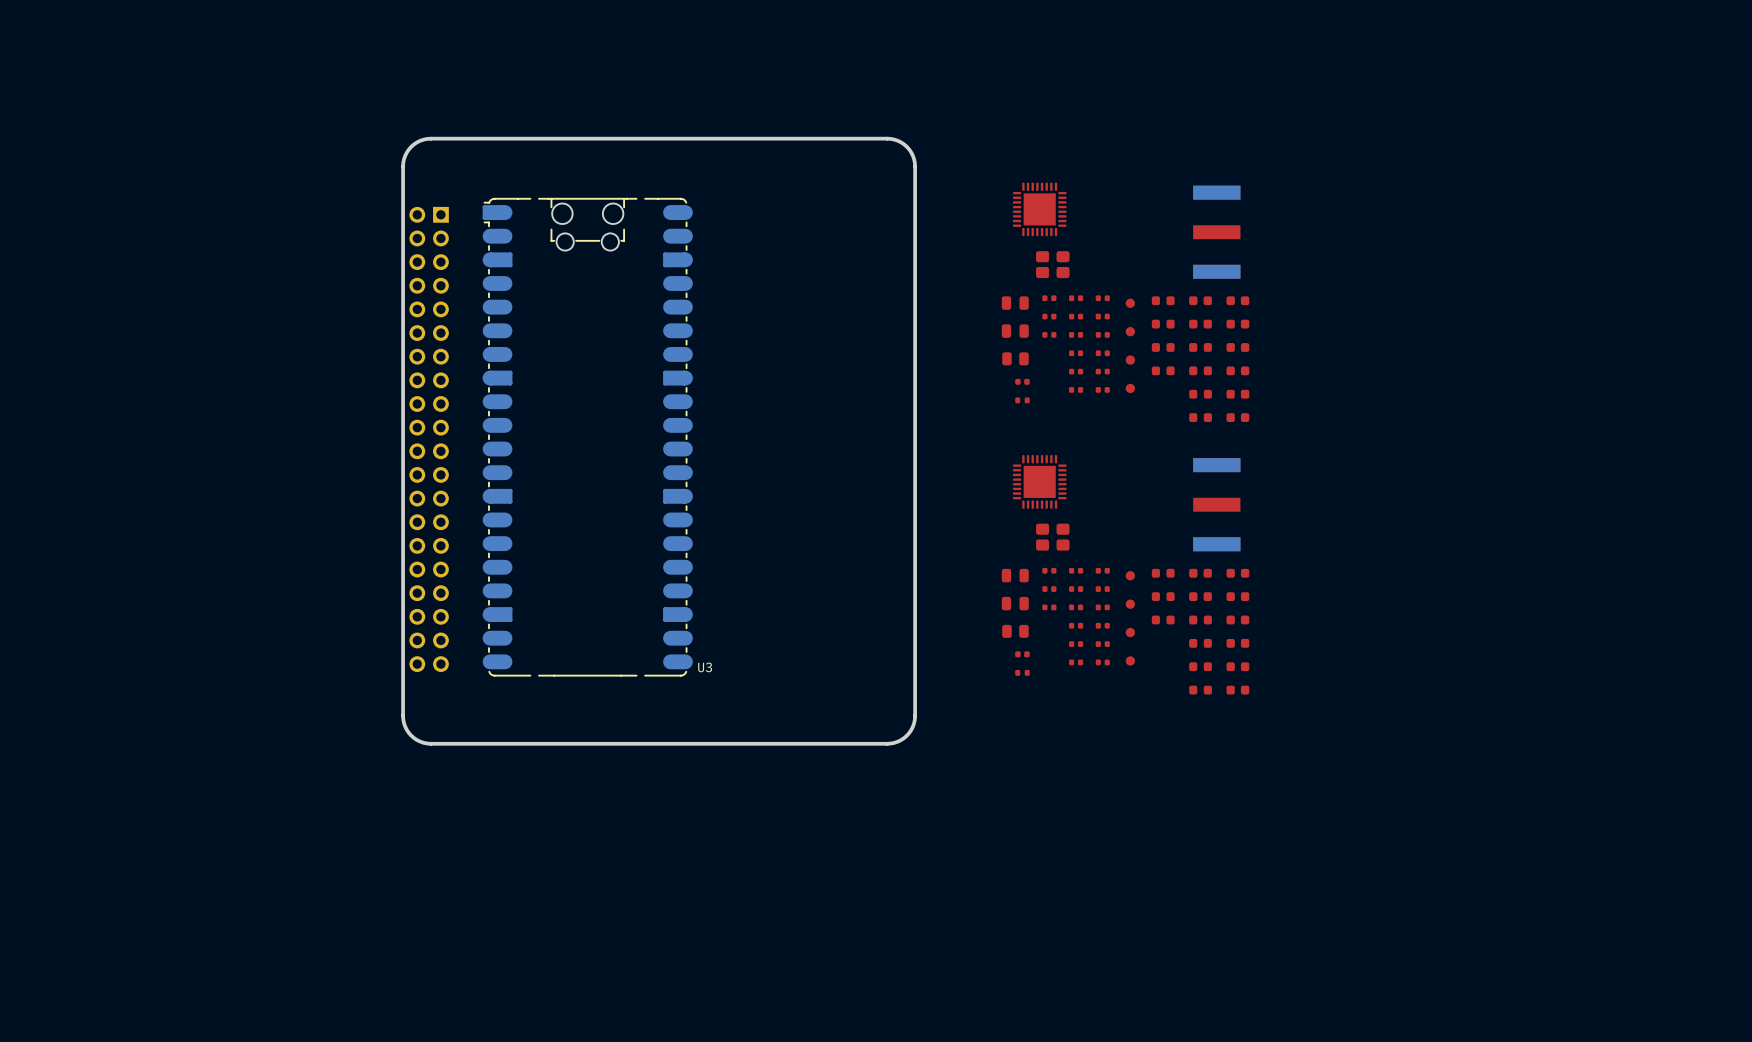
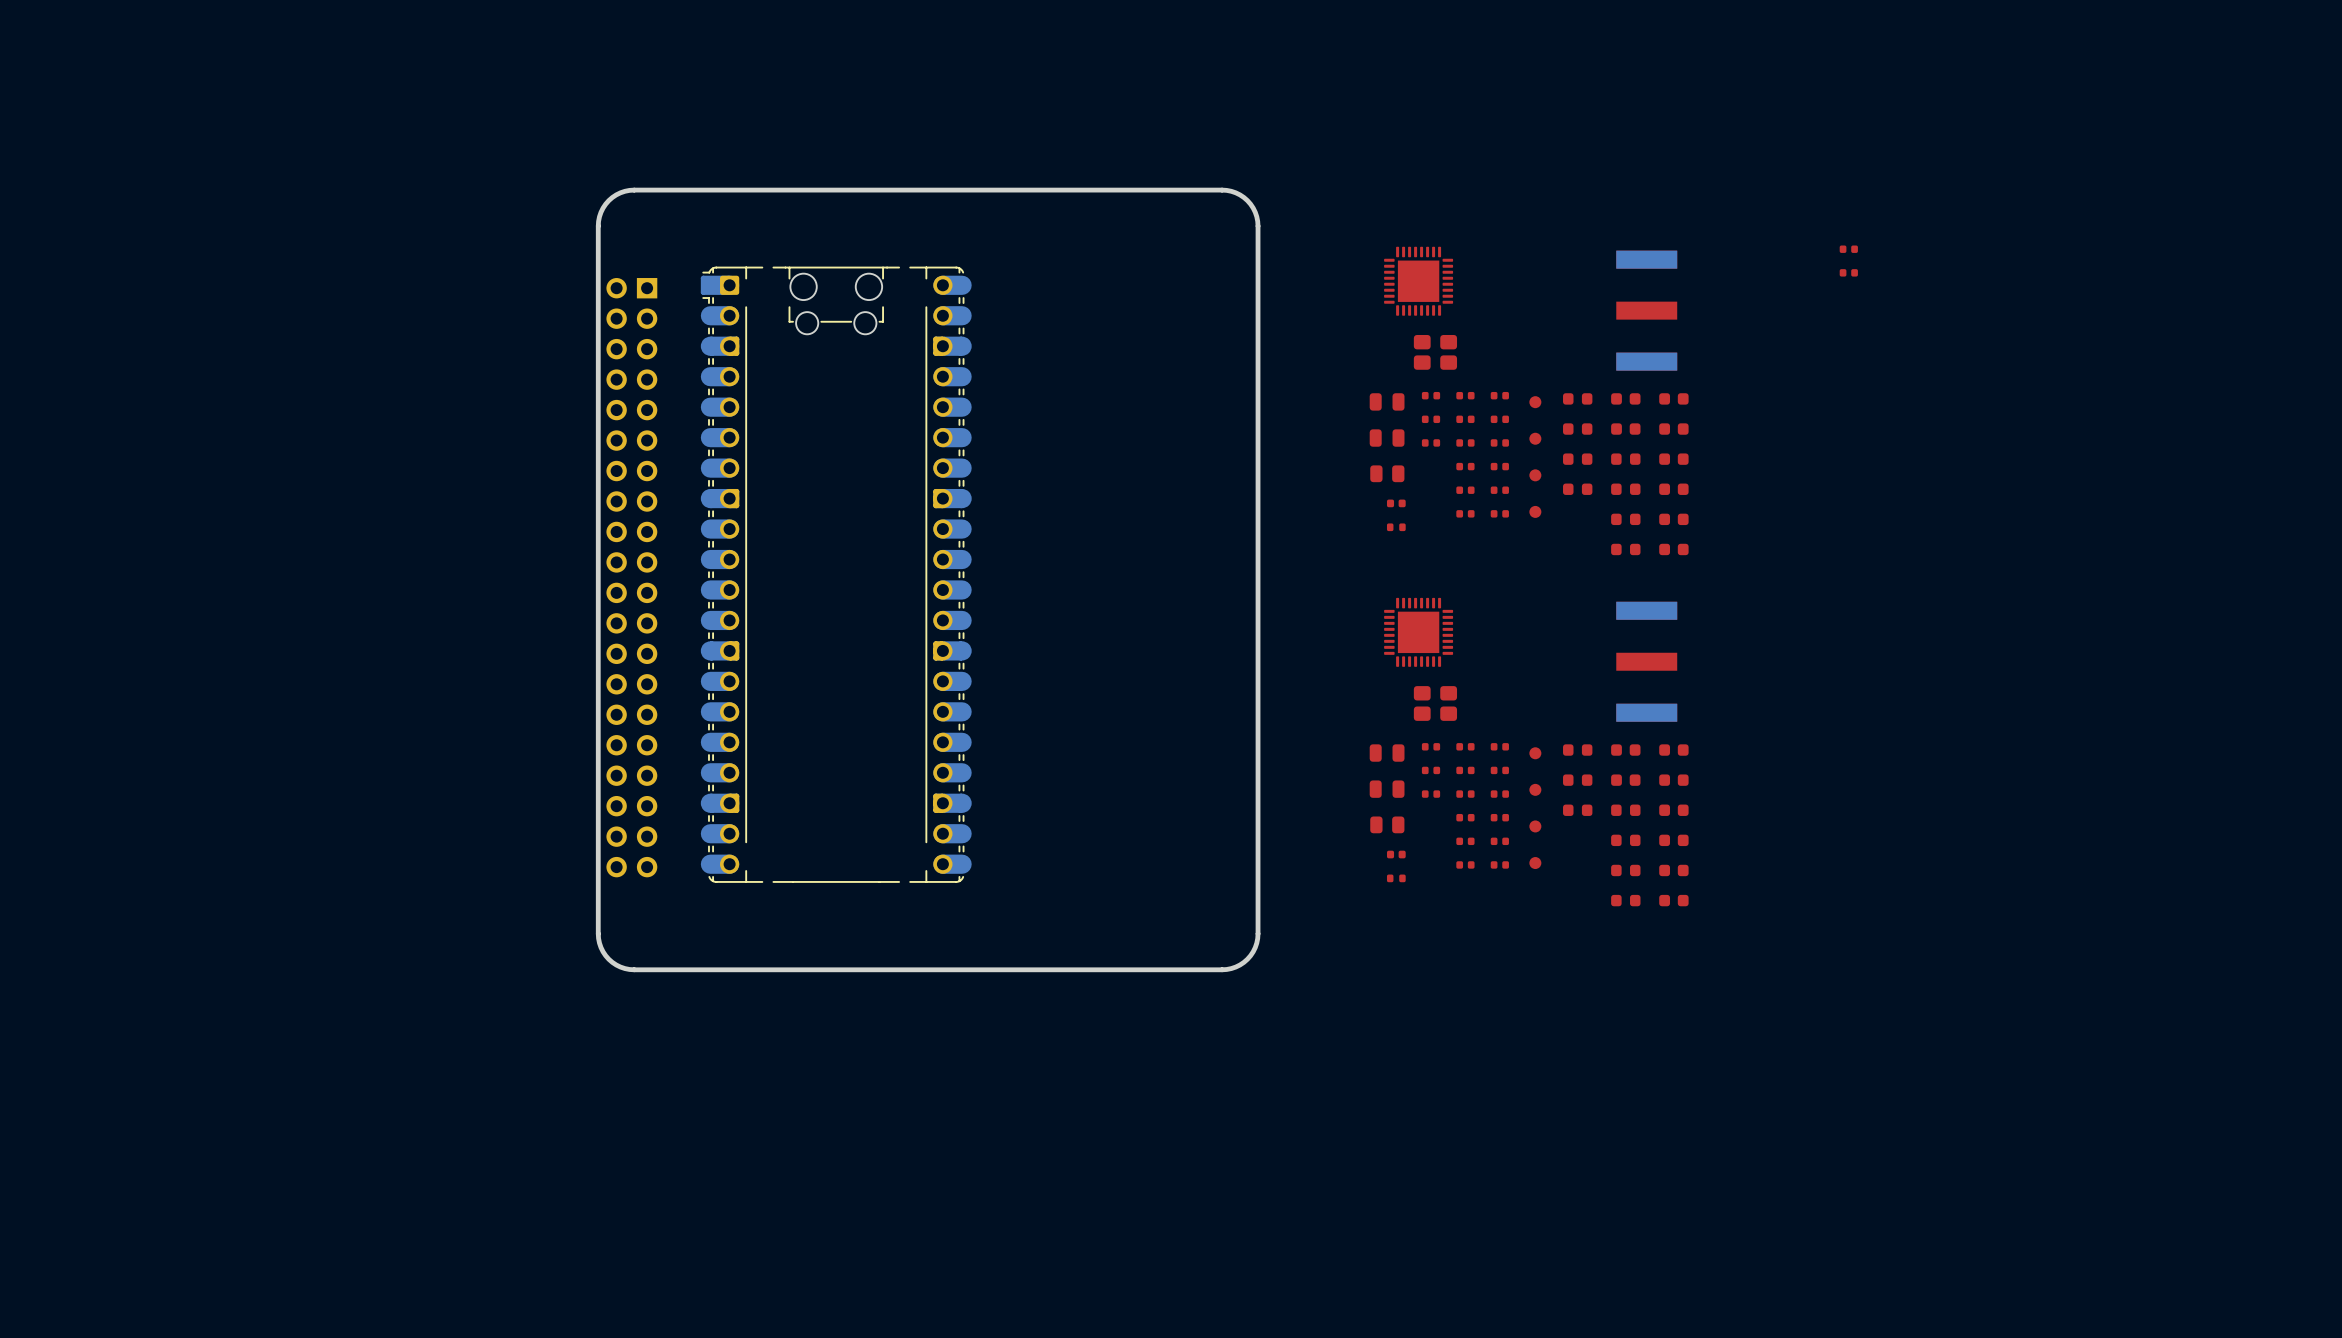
part: none -> (1848, 249)
part: none -> (1848, 272)
U3: (587, 437) -> none
part: none -> (836, 574)

